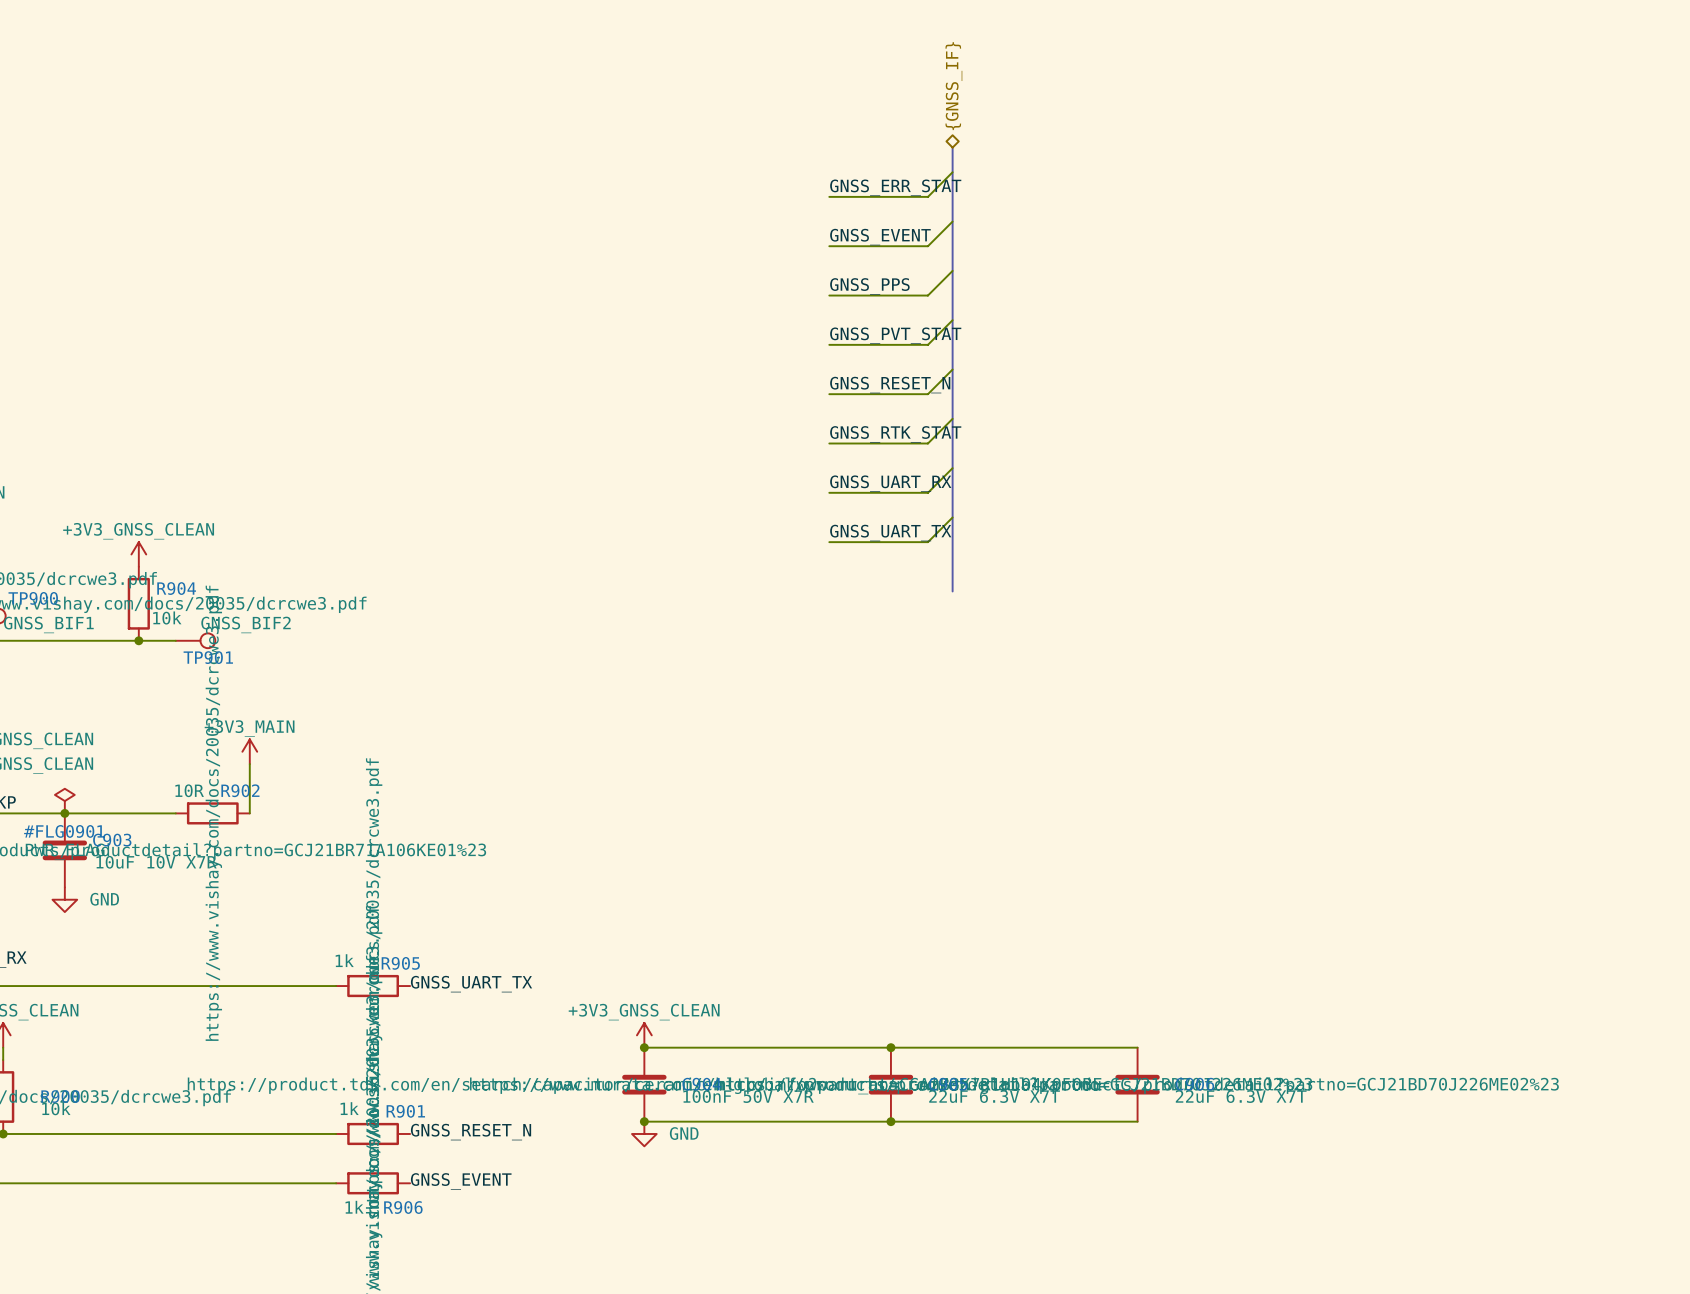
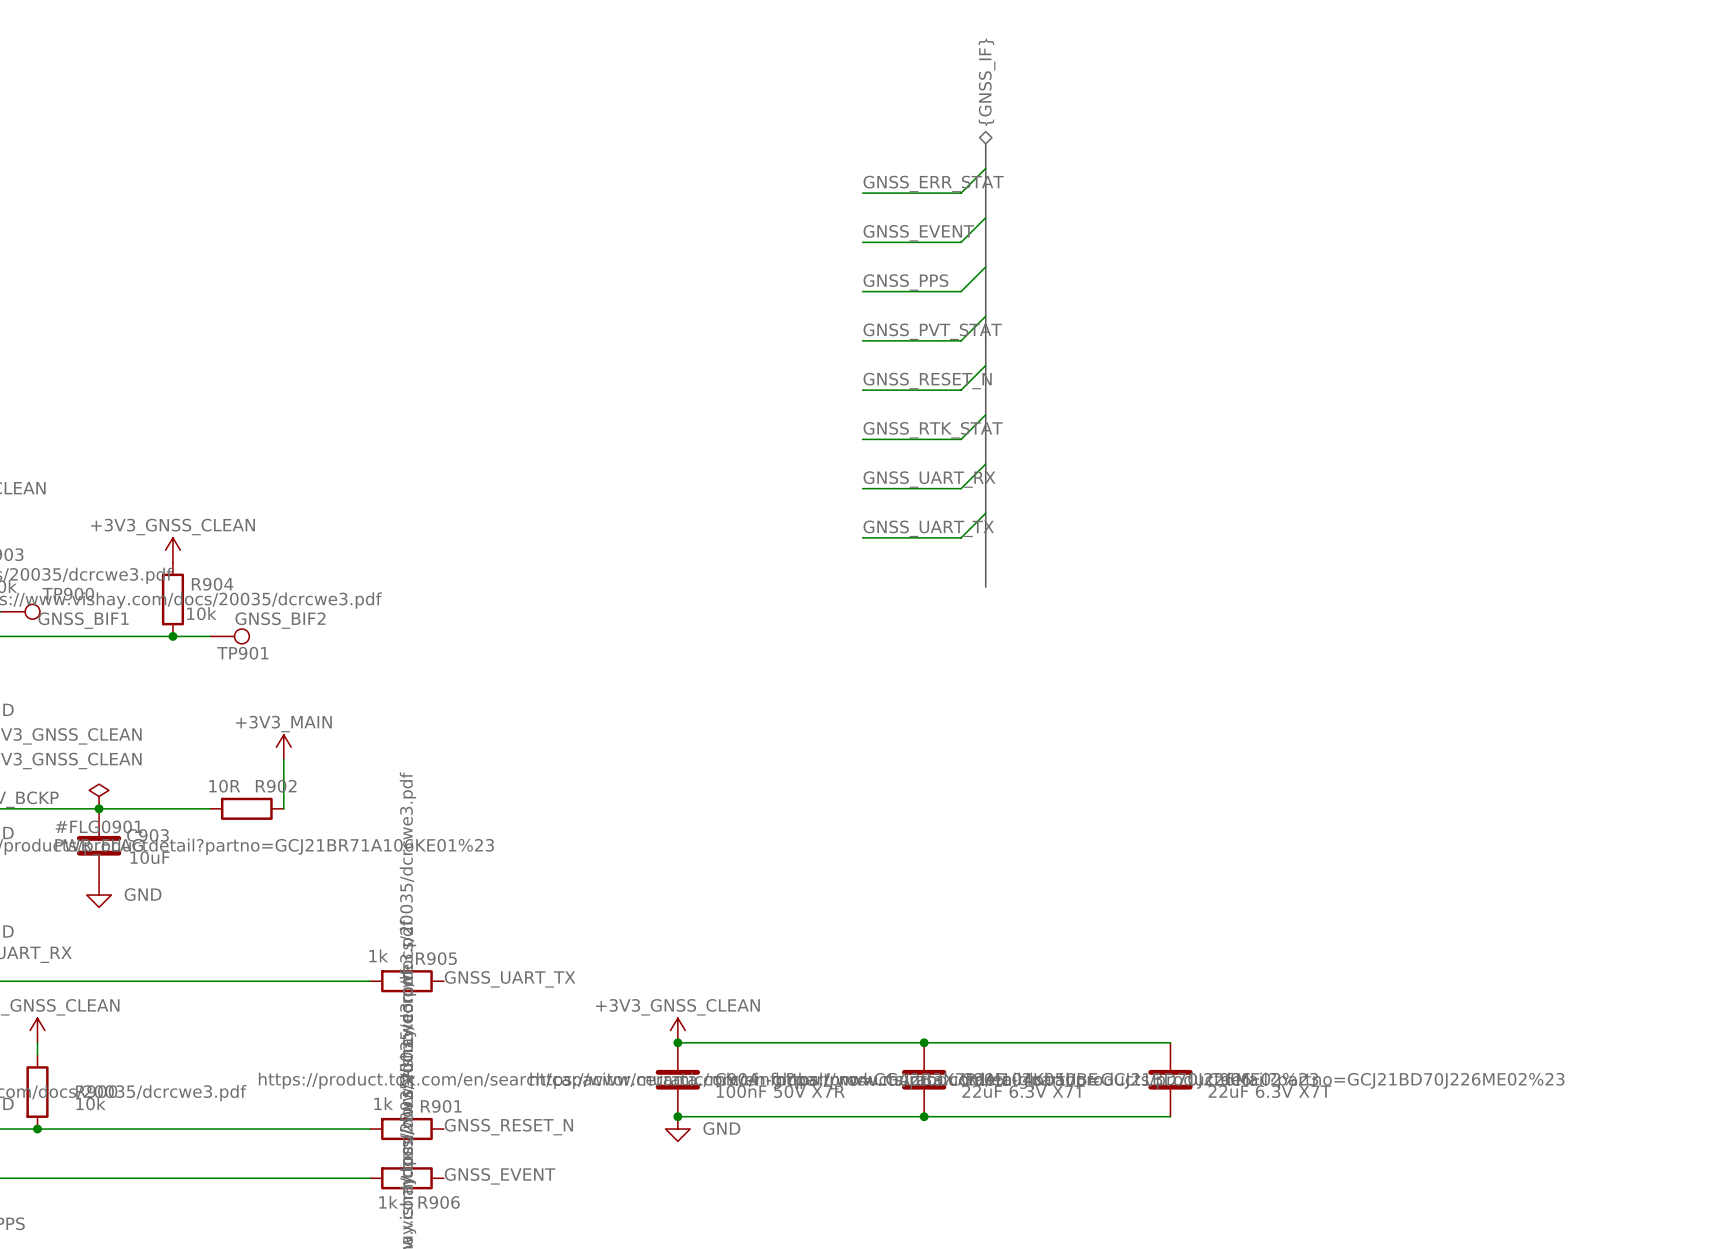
R902 text: https://www.vishay.com/docs/20035/dcrcwe3.pdf (213, 813) -> none
C903 value: 10uF 10V X7R (156, 862) -> 10uF (150, 857)

